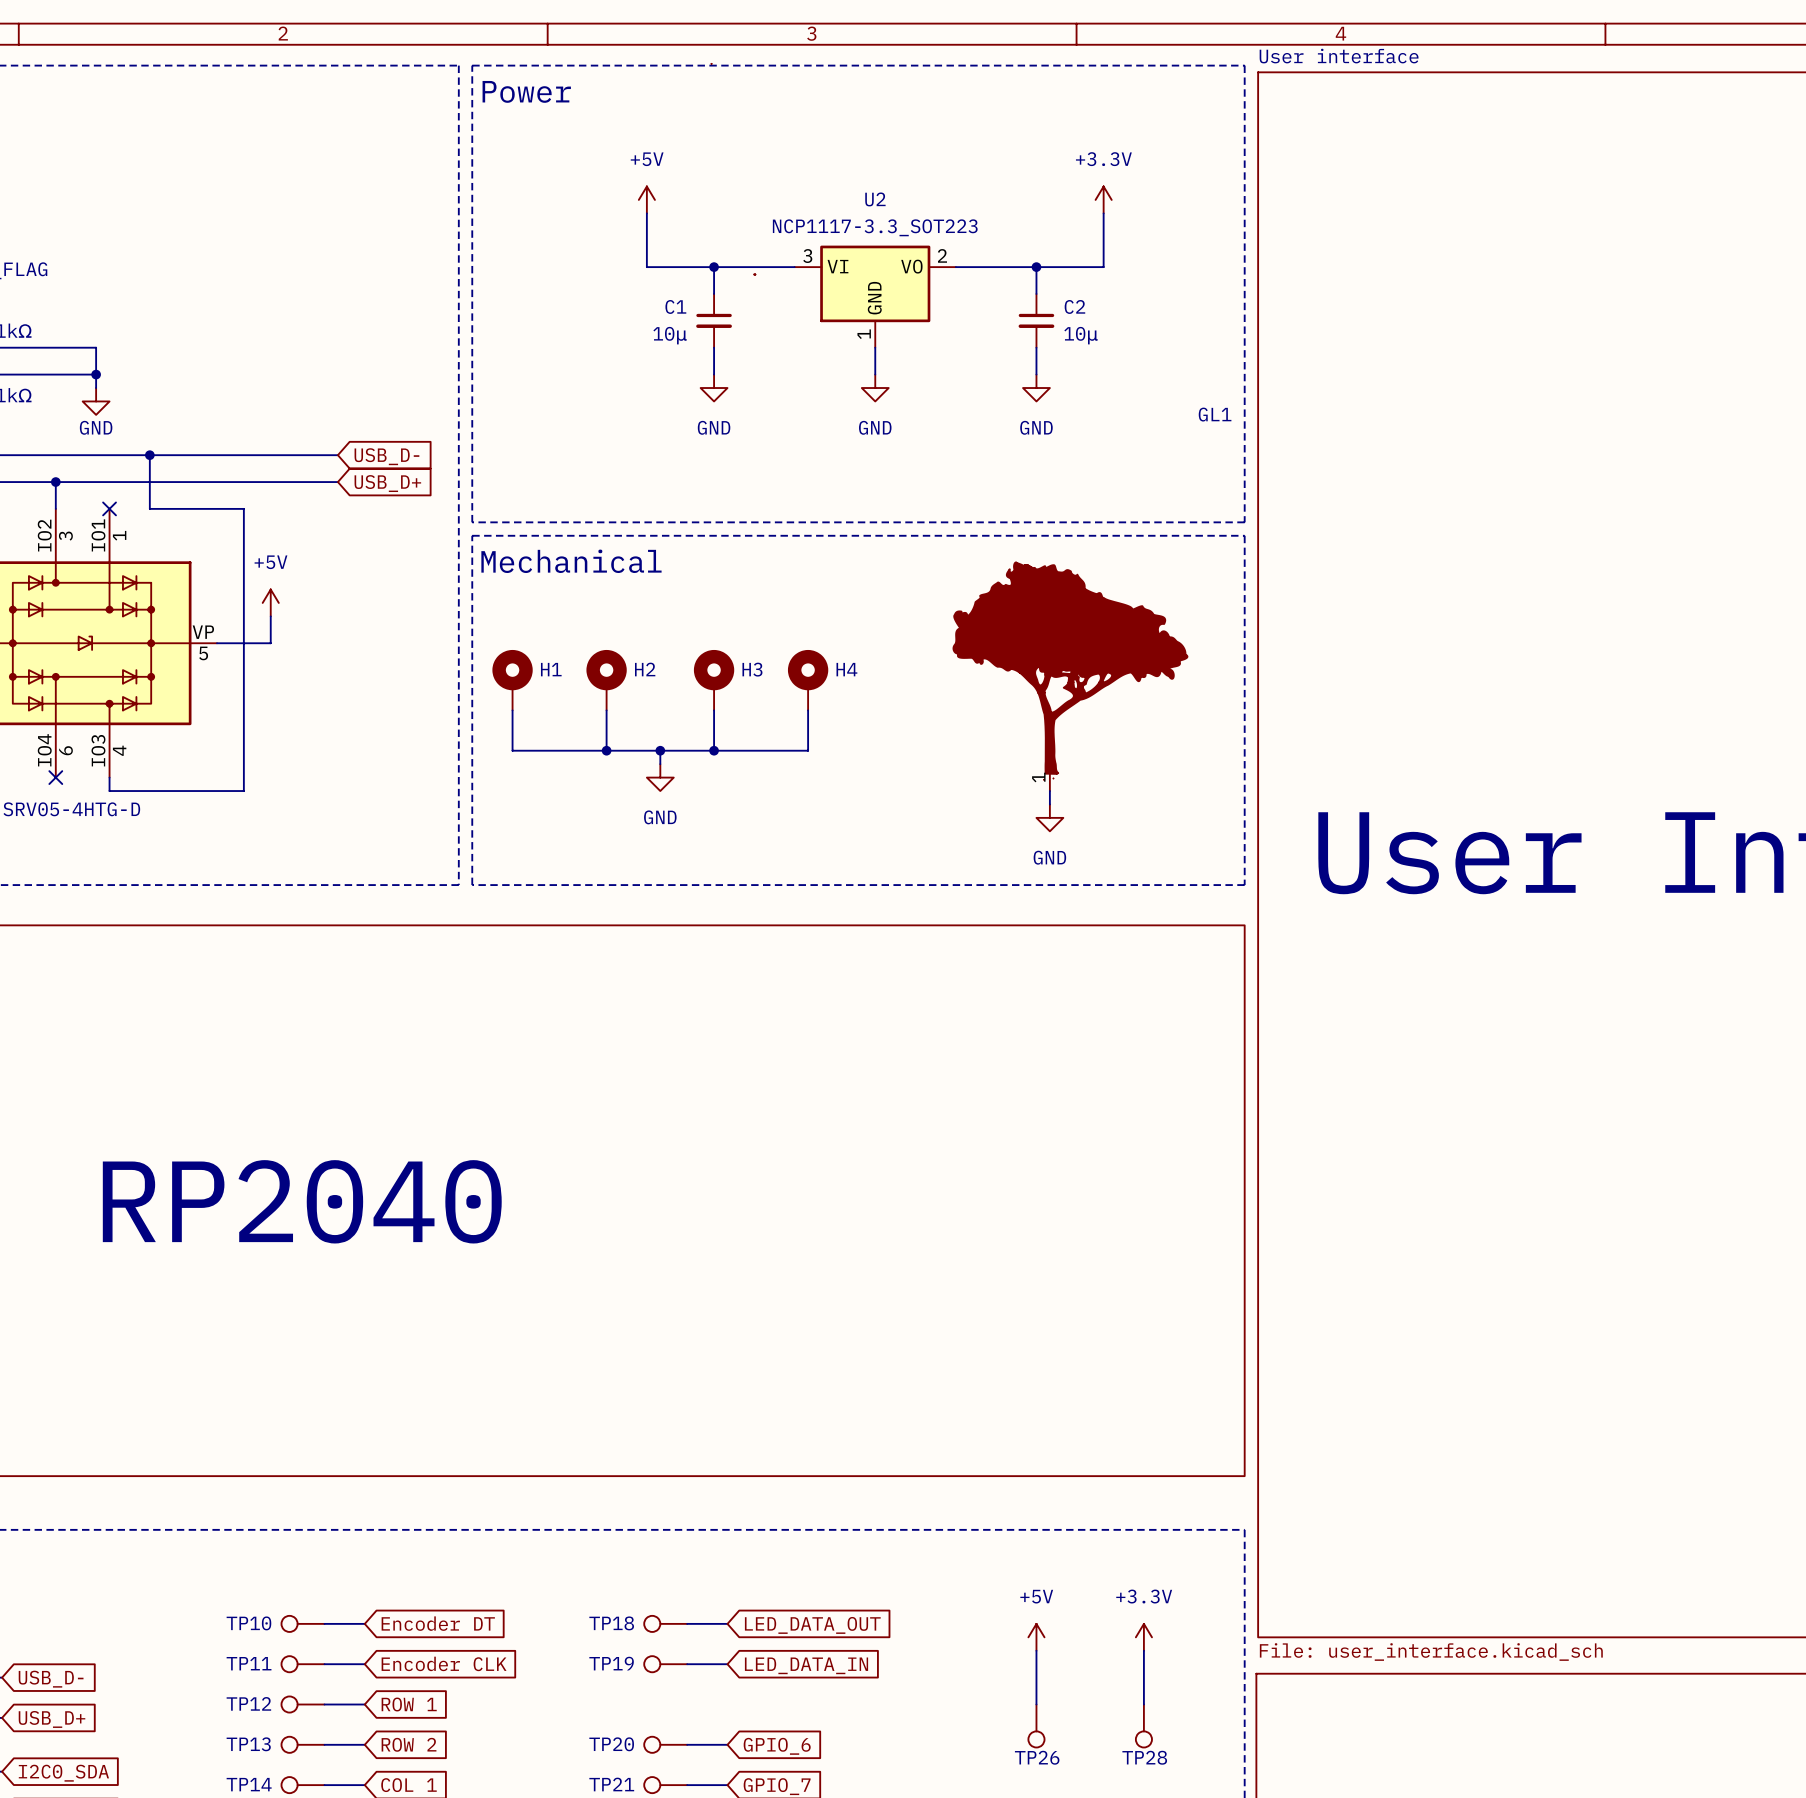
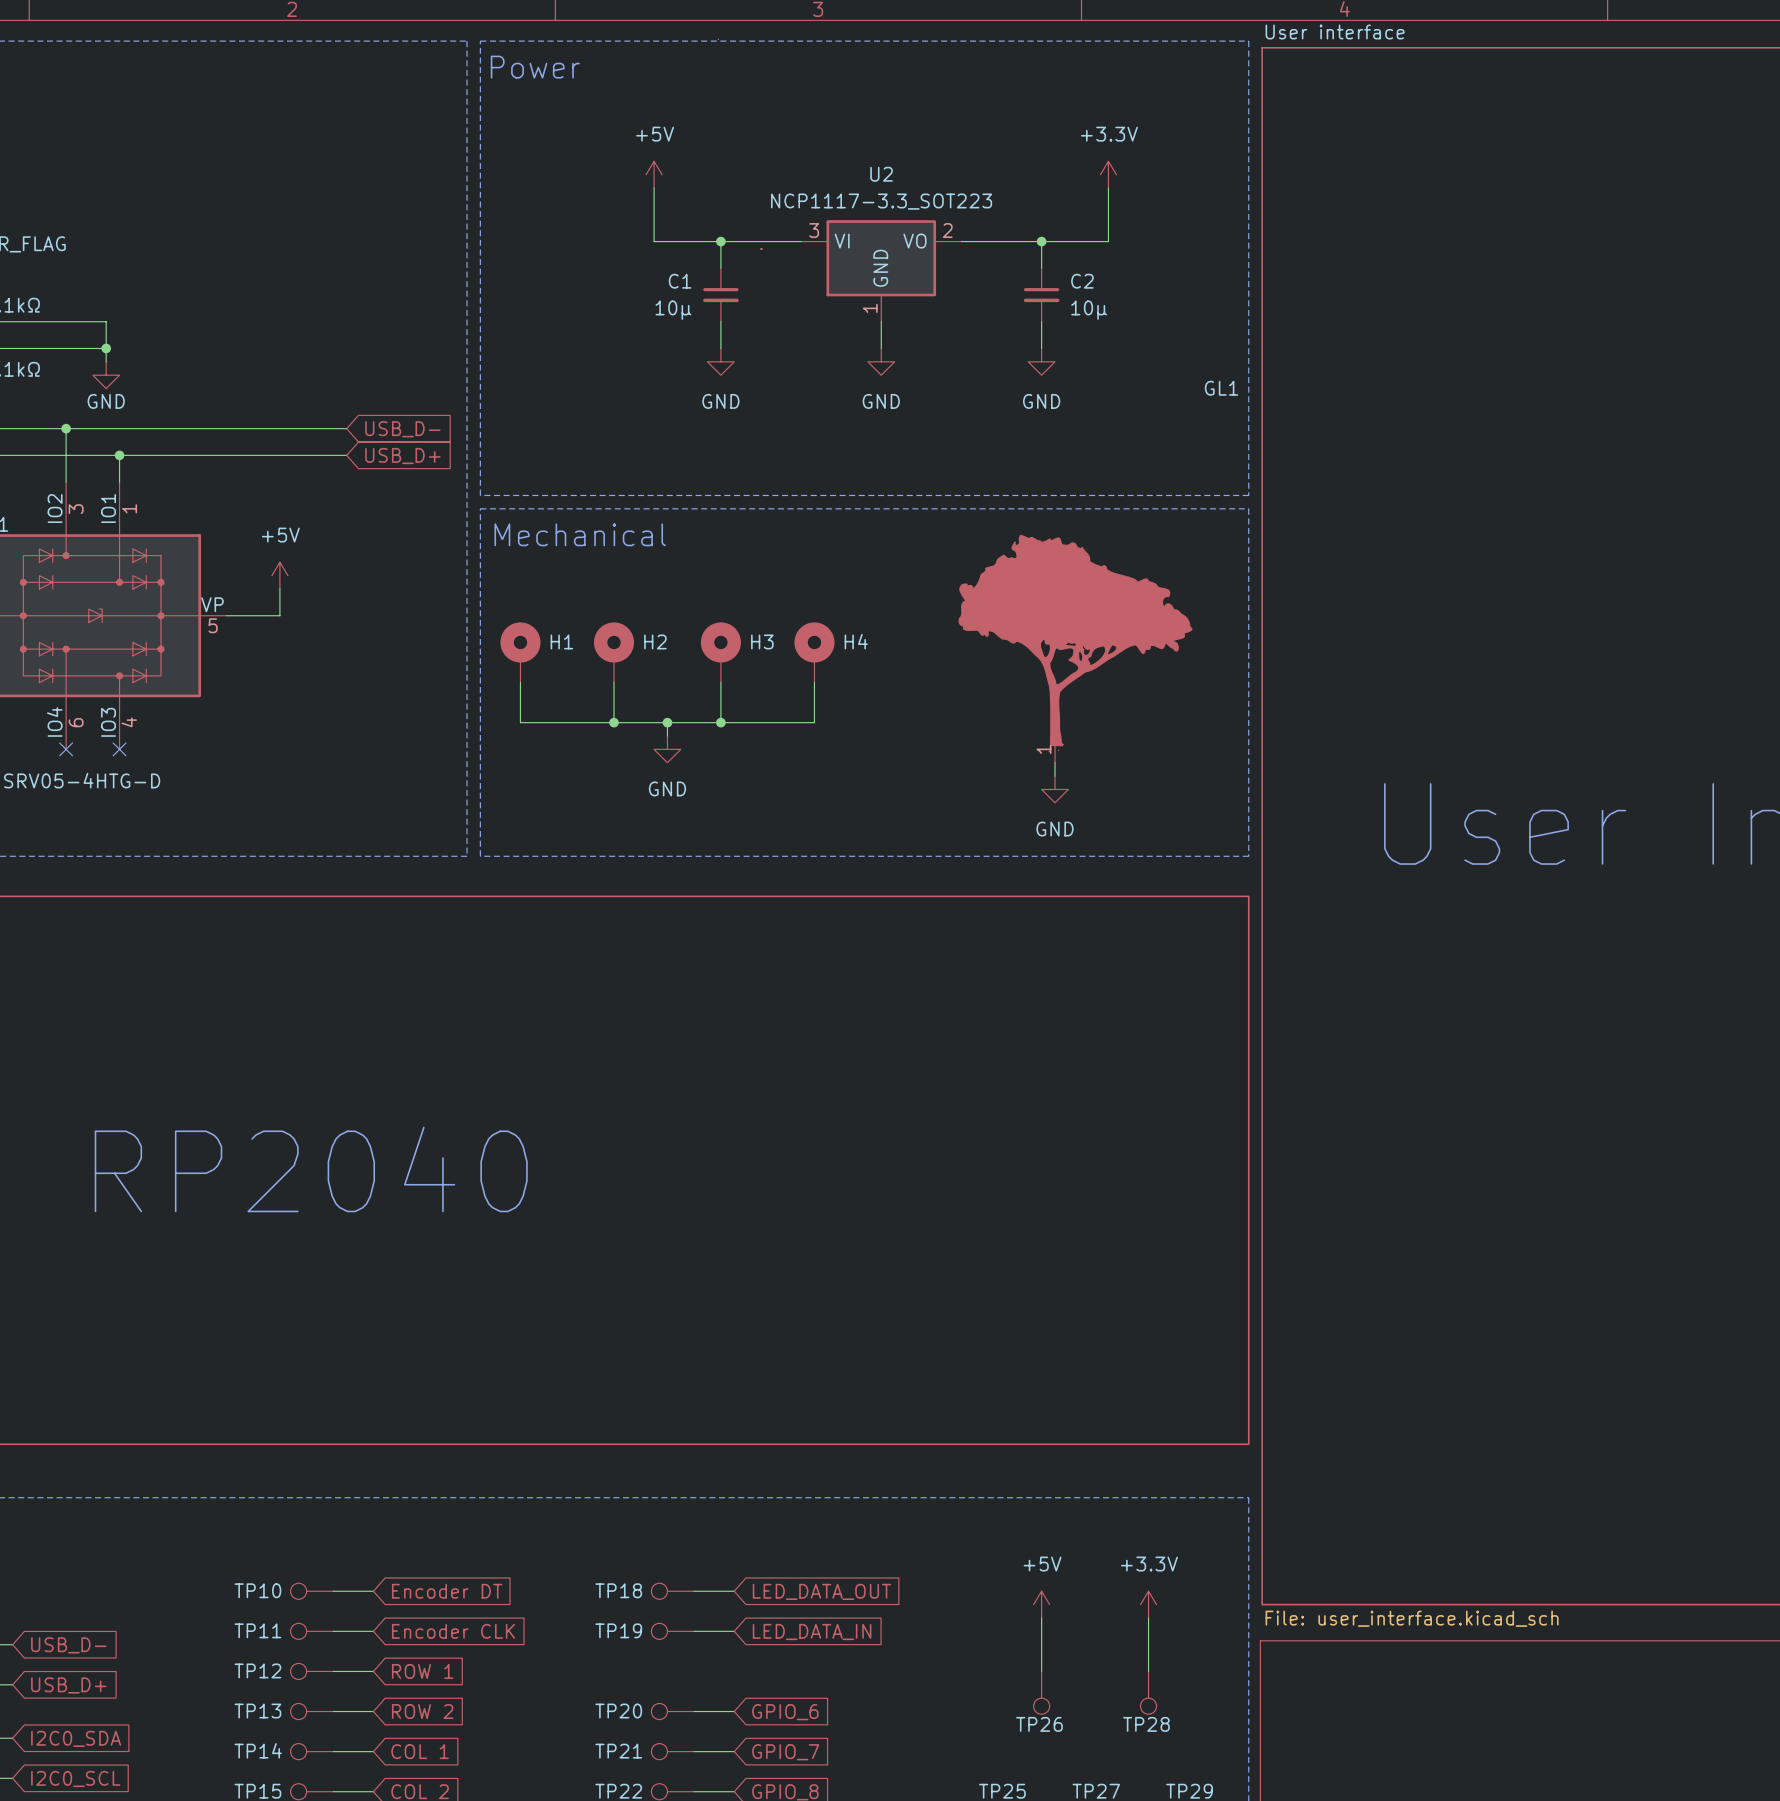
wire: none -> (66, 428) (66, 455)
junction: none -> (66, 428)
wire: (149, 455) (149, 508) (243, 508) (243, 791) (109, 791) (109, 777) -> none
junction: (149, 455) -> none
junction: (55, 482) -> none
wire: none -> (119, 455) (119, 482)
junction: none -> (119, 455)
no-connect mark: (109, 508) -> none
no-connect mark: none -> (119, 749)

